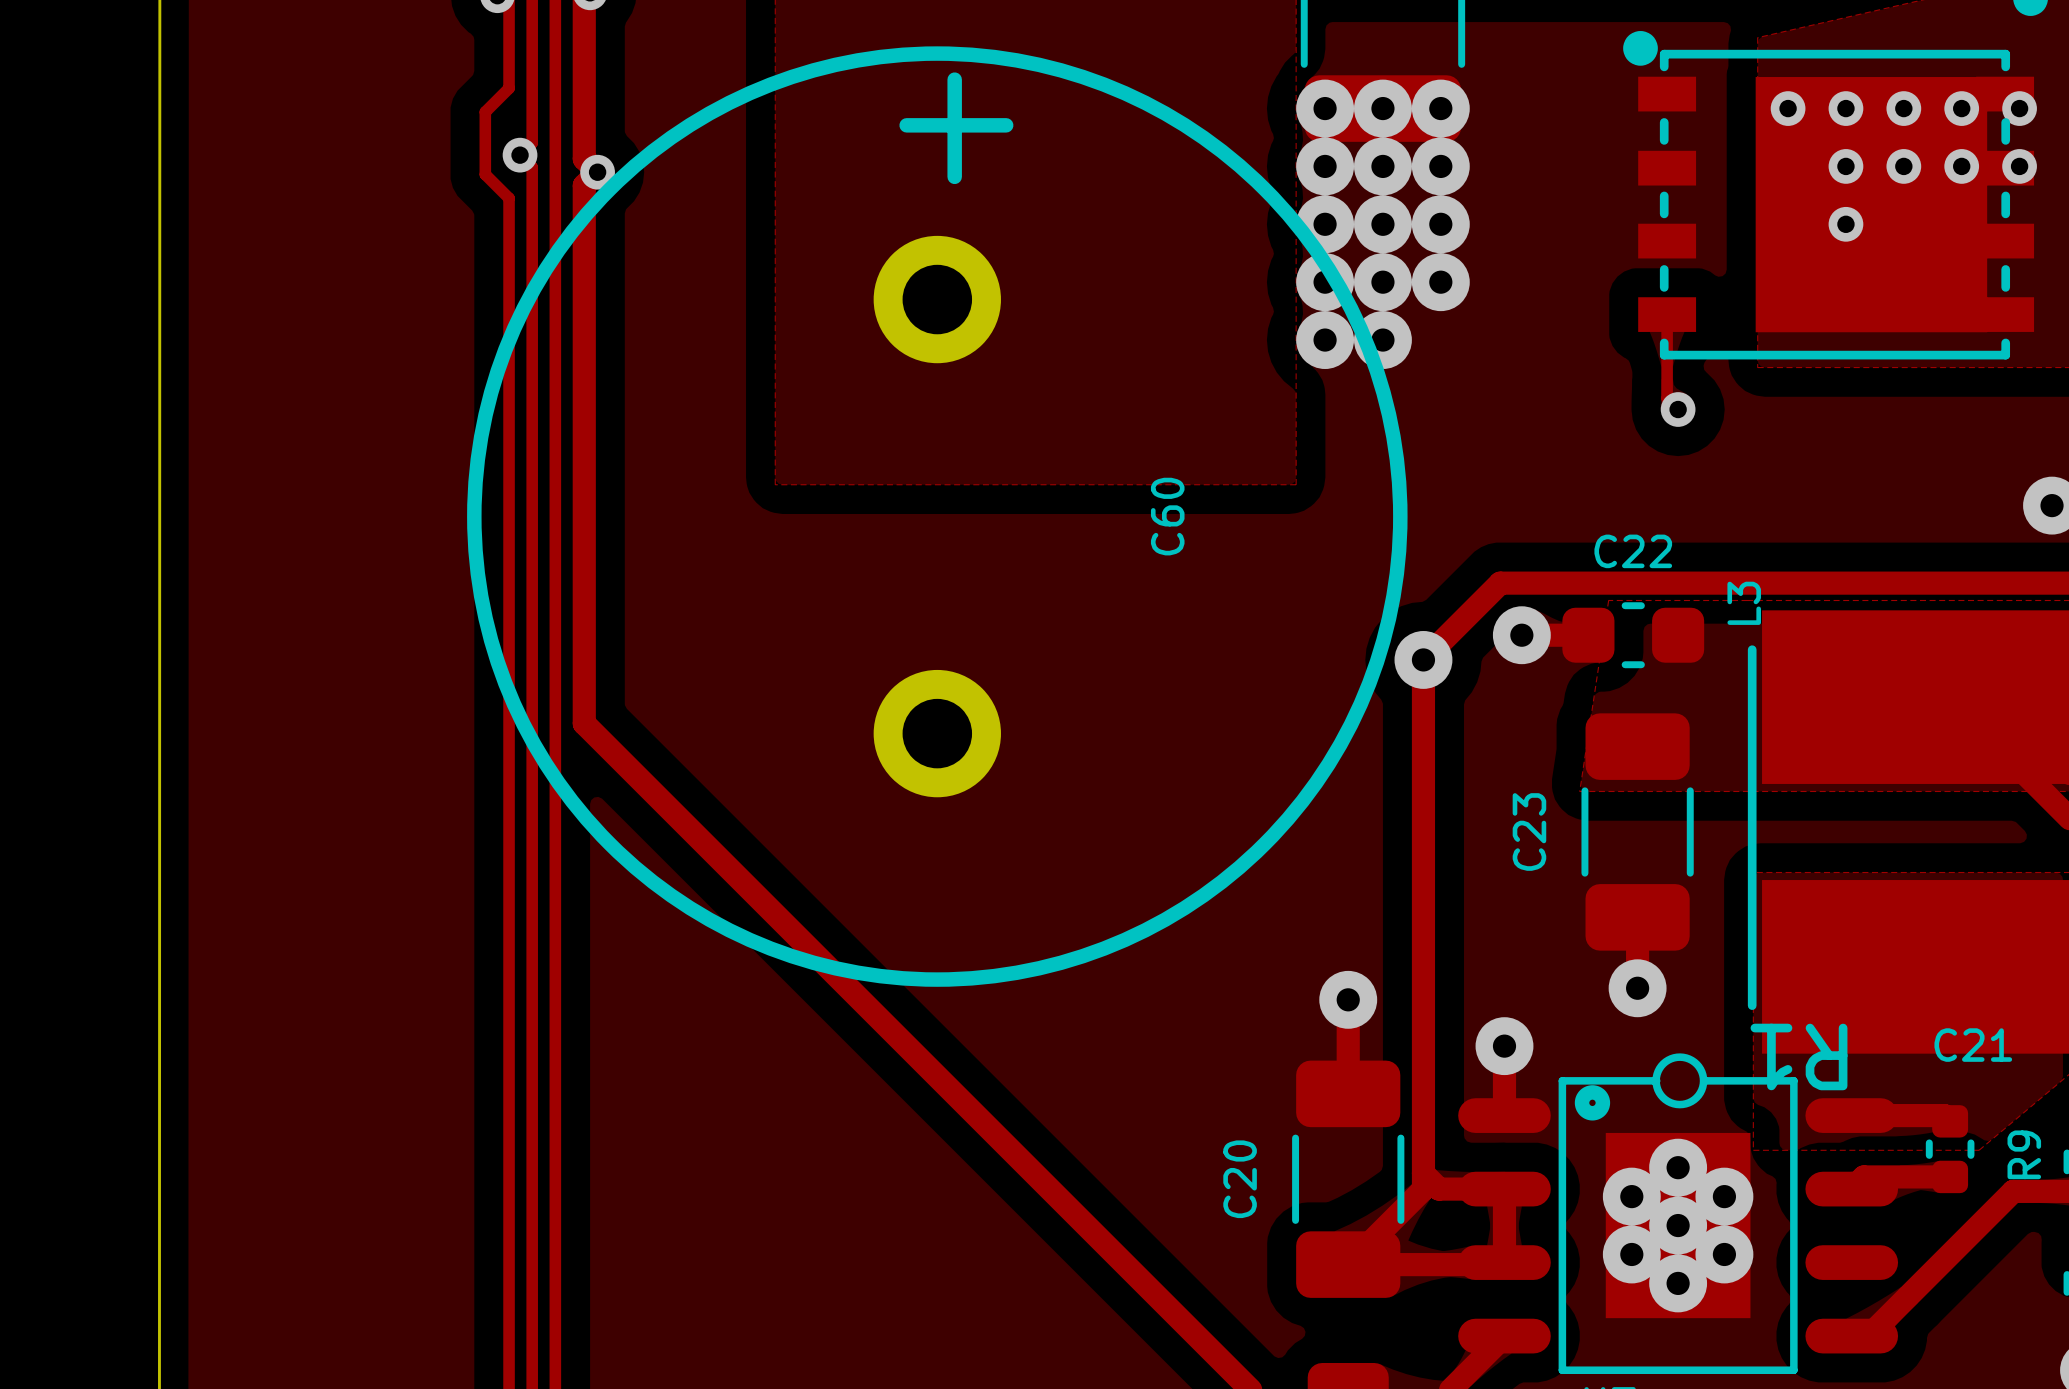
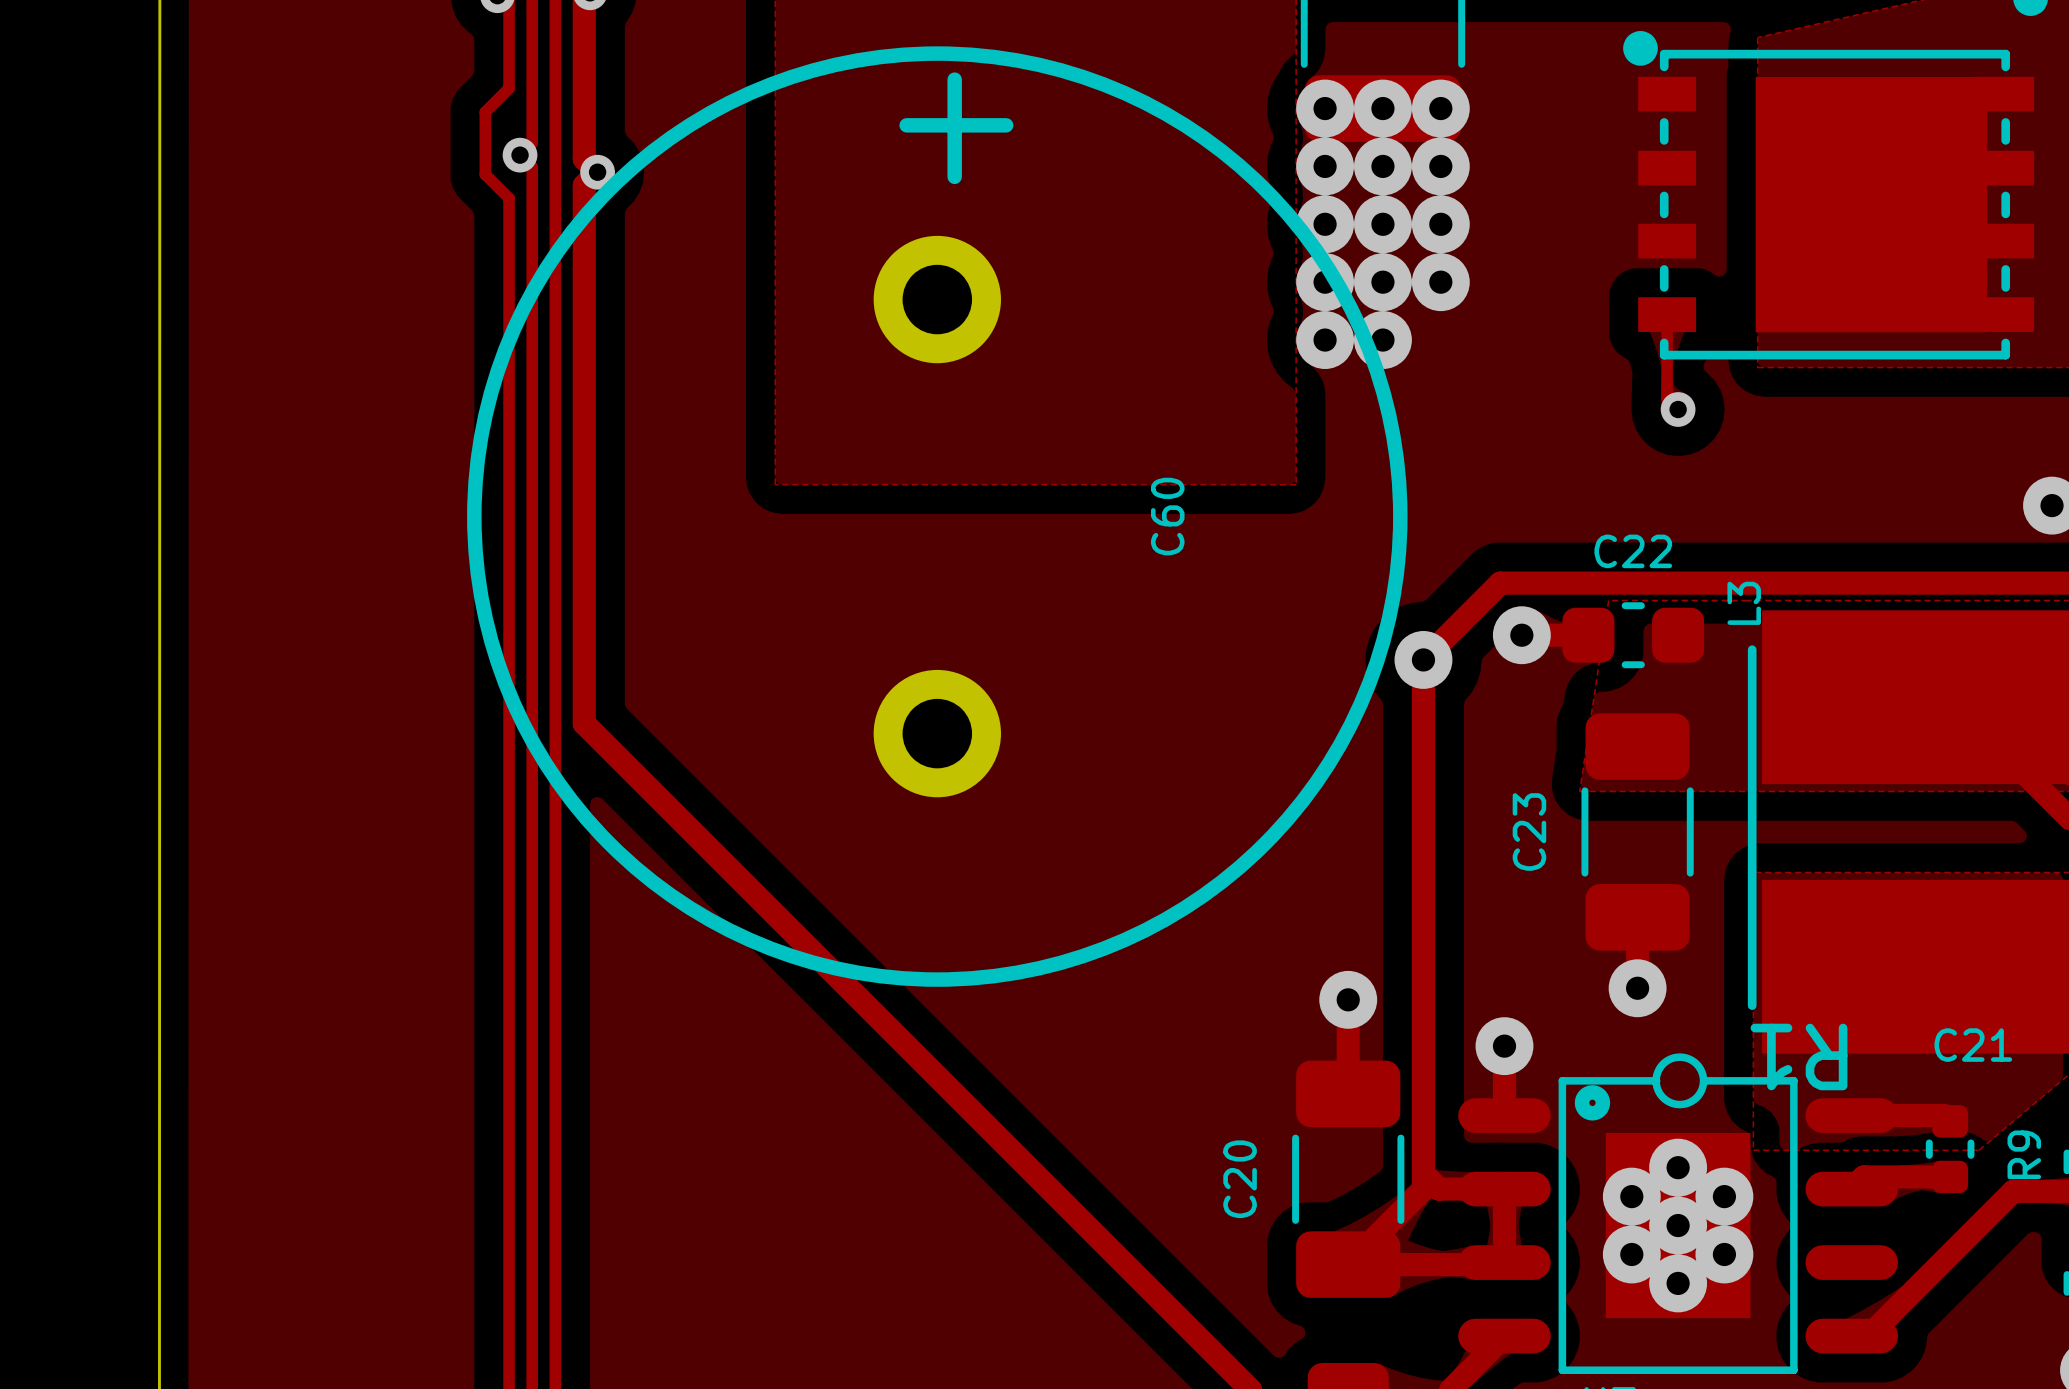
via: (1788, 108) -> none
via: (1845, 108) -> none
via: (1903, 108) -> none
via: (1961, 108) -> none
via: (2019, 108) -> none
via: (1845, 166) -> none
via: (1903, 166) -> none
via: (1961, 166) -> none
via: (2019, 166) -> none
via: (1845, 224) -> none

